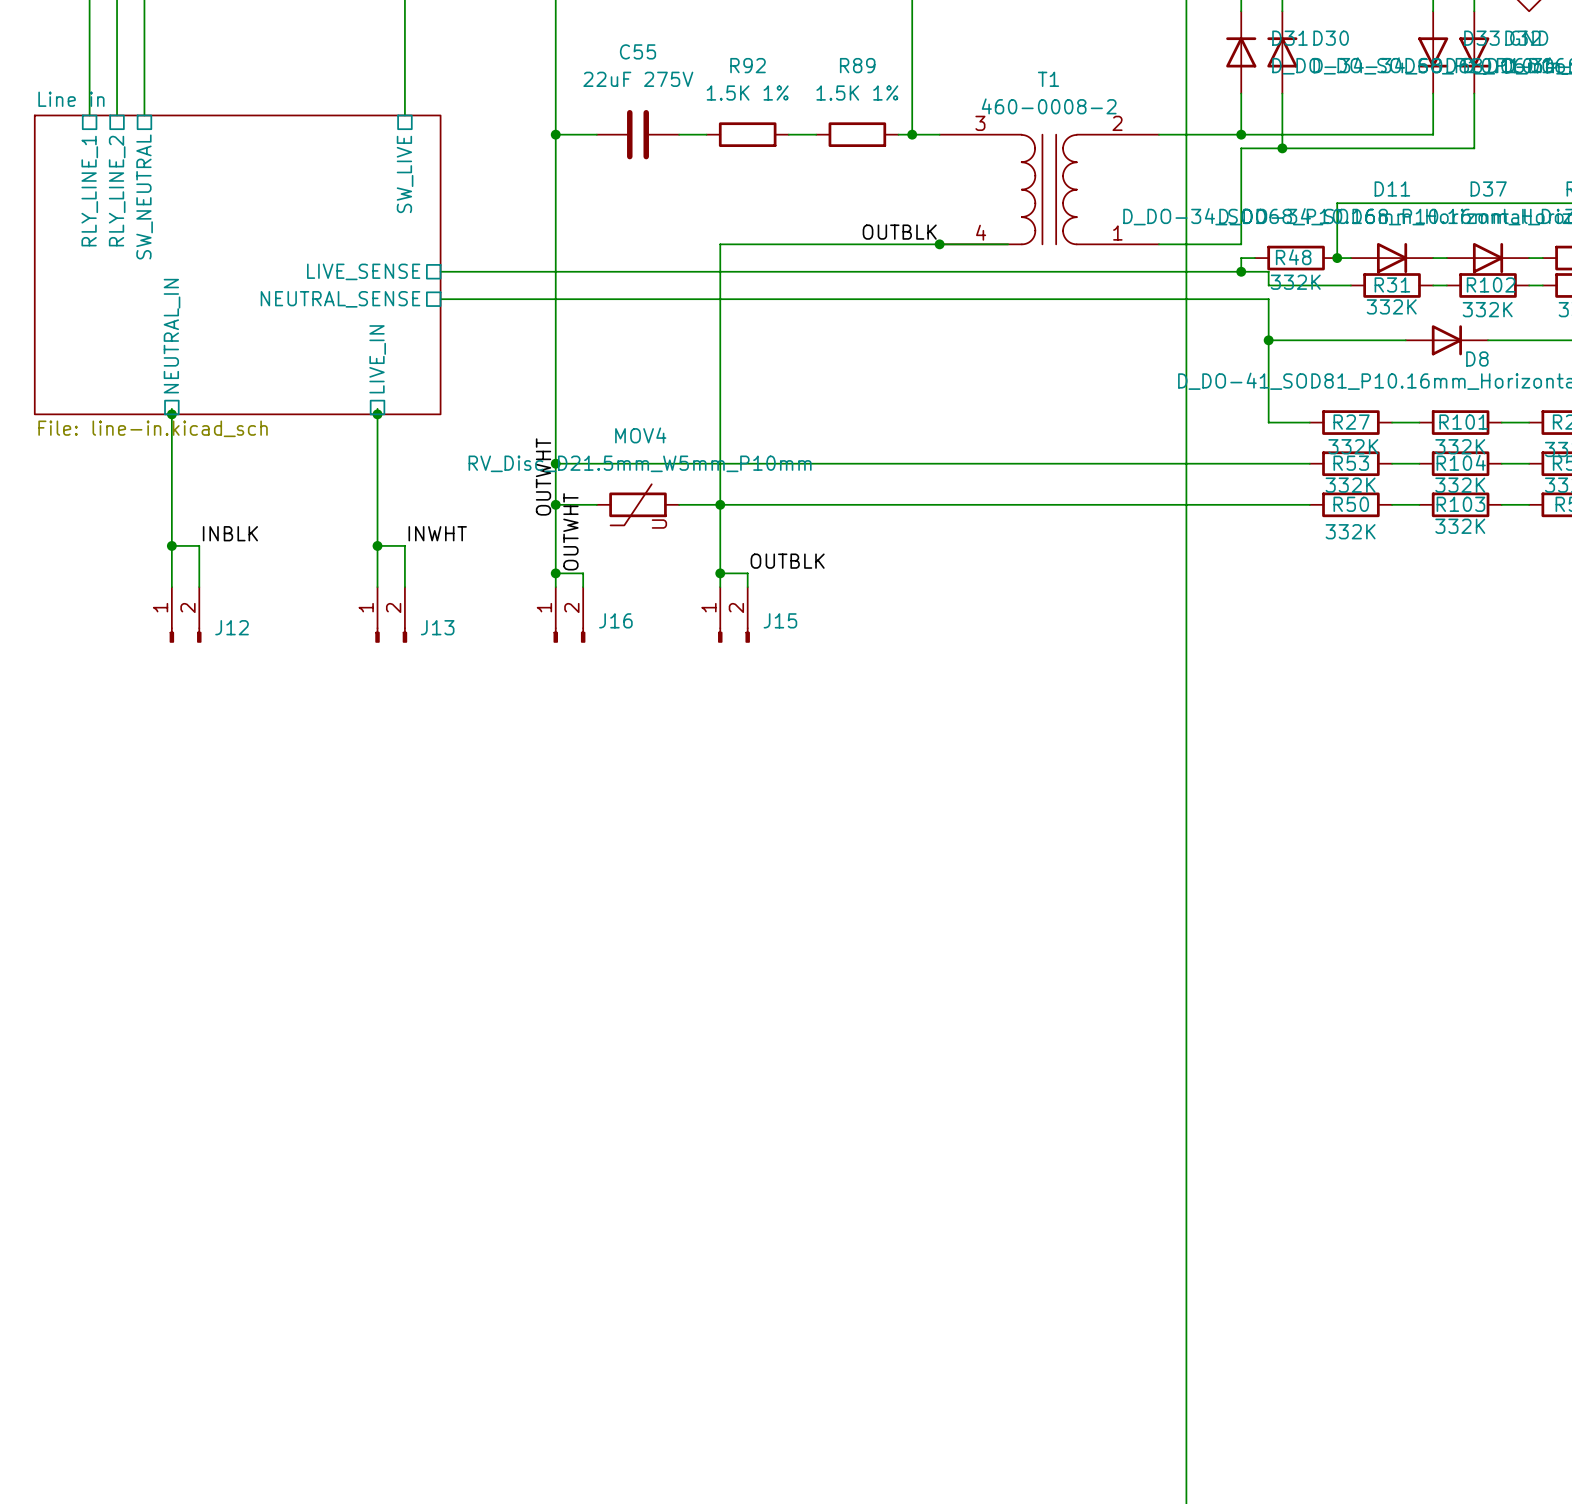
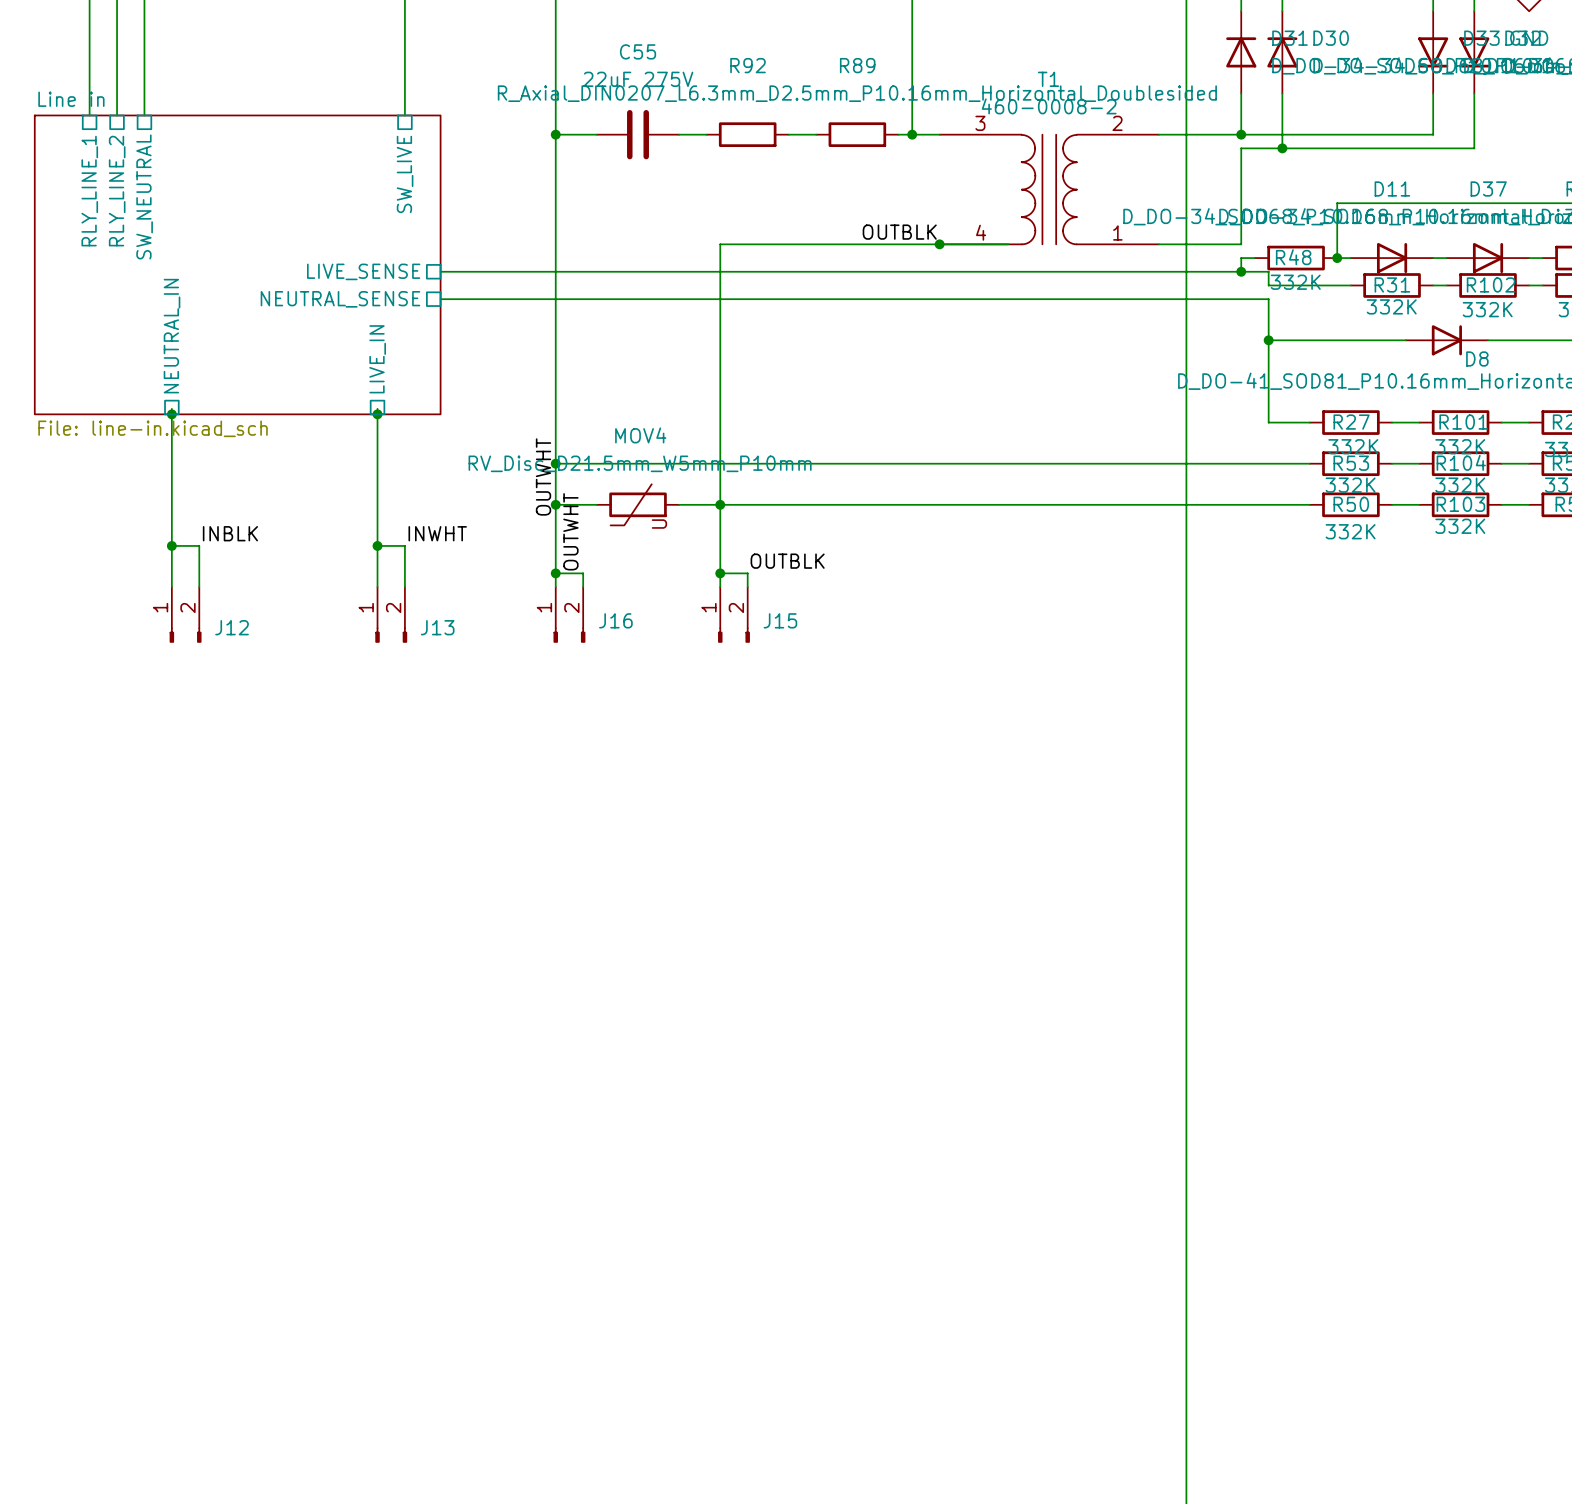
R92 value: 1.5K 1% (747, 93) -> none
R89 value: 1.5K 1% (857, 93) -> R_Axial_DIN0207_L6.3mm_D2.5mm_P10.16mm_Horizontal_Doublesided (857, 93)

